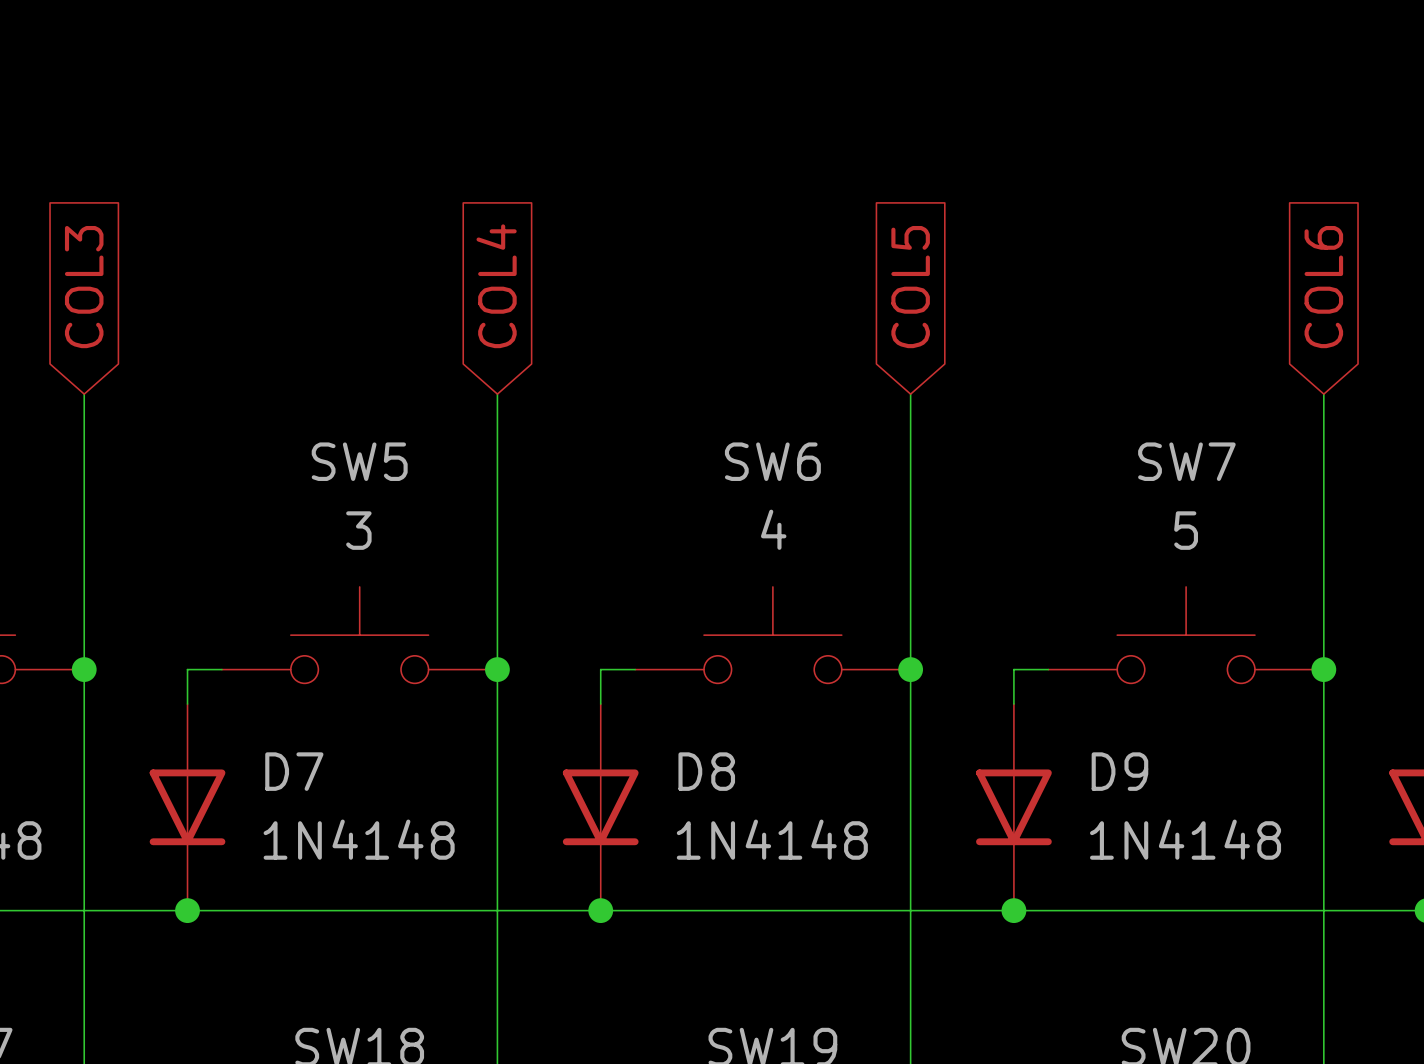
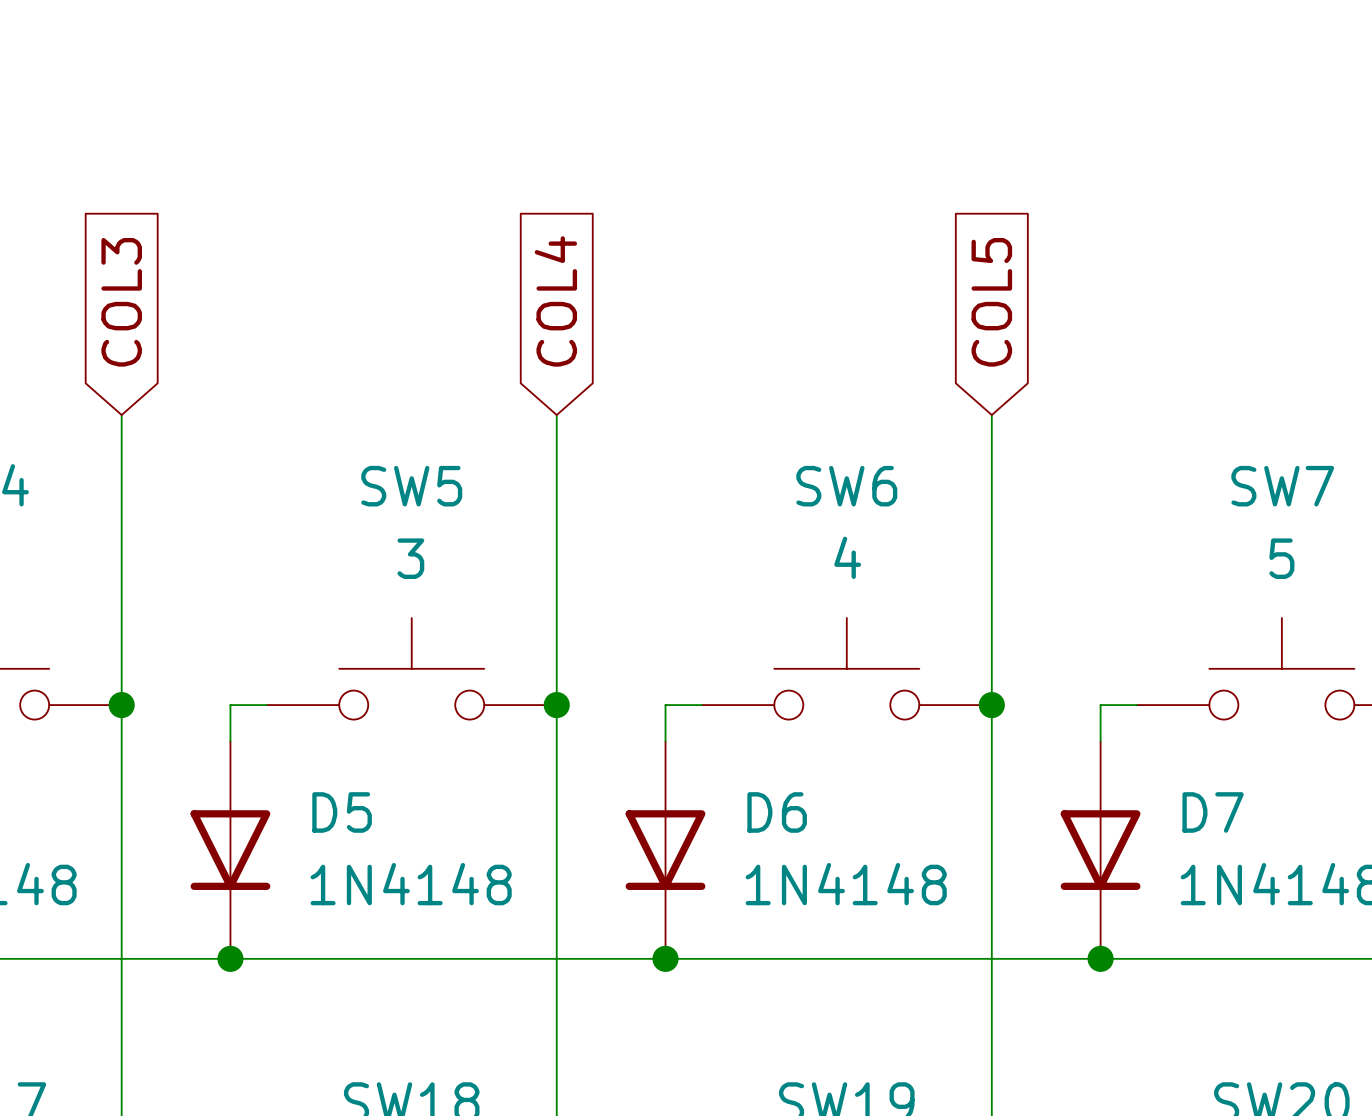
D7 name: D7 (294, 771) -> D5 (342, 812)
D8 name: D8 (706, 771) -> D6 (777, 812)
D9 name: D9 (1119, 771) -> D7 (1213, 812)

